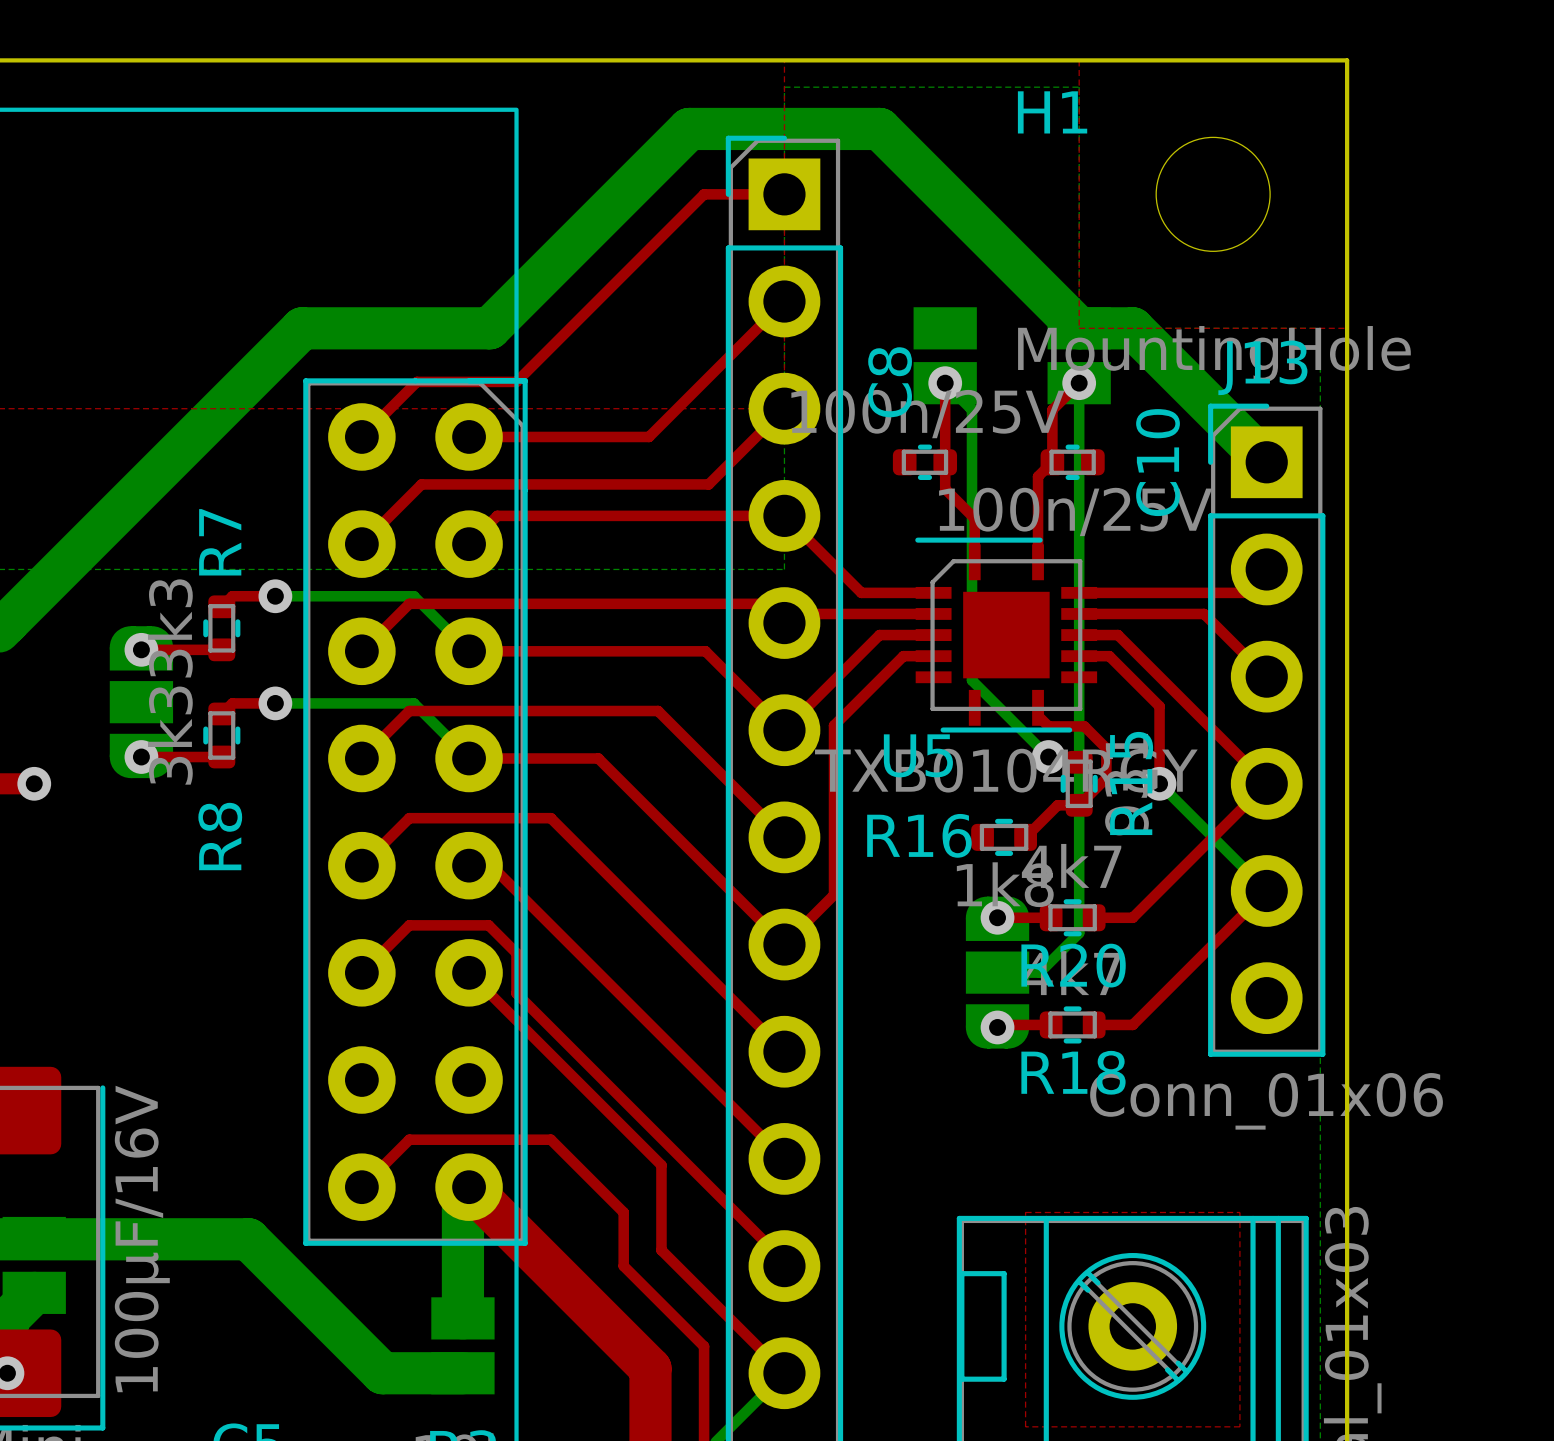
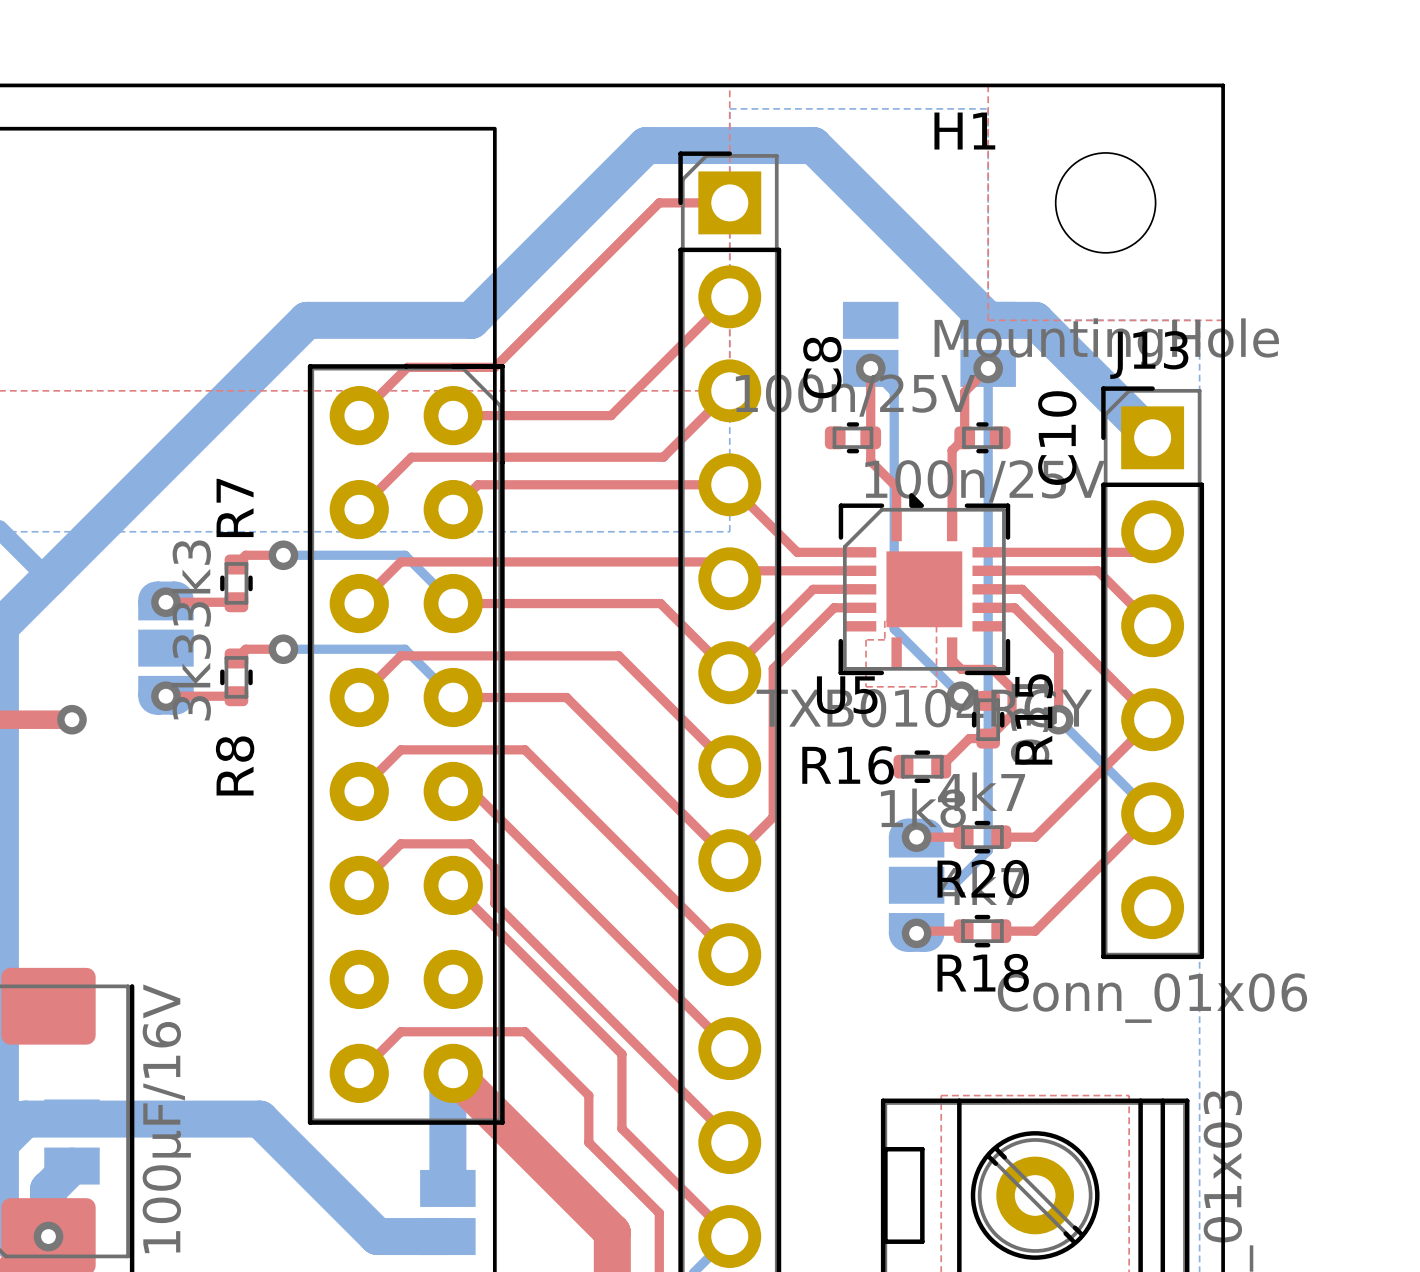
U5 footprint: [915, 537, 1098, 733] -> [838, 493, 1011, 676]
top zone outline: none -> (884, 621) (936, 621) (936, 686) (866, 686) (866, 639) (884, 639) (884, 621)

